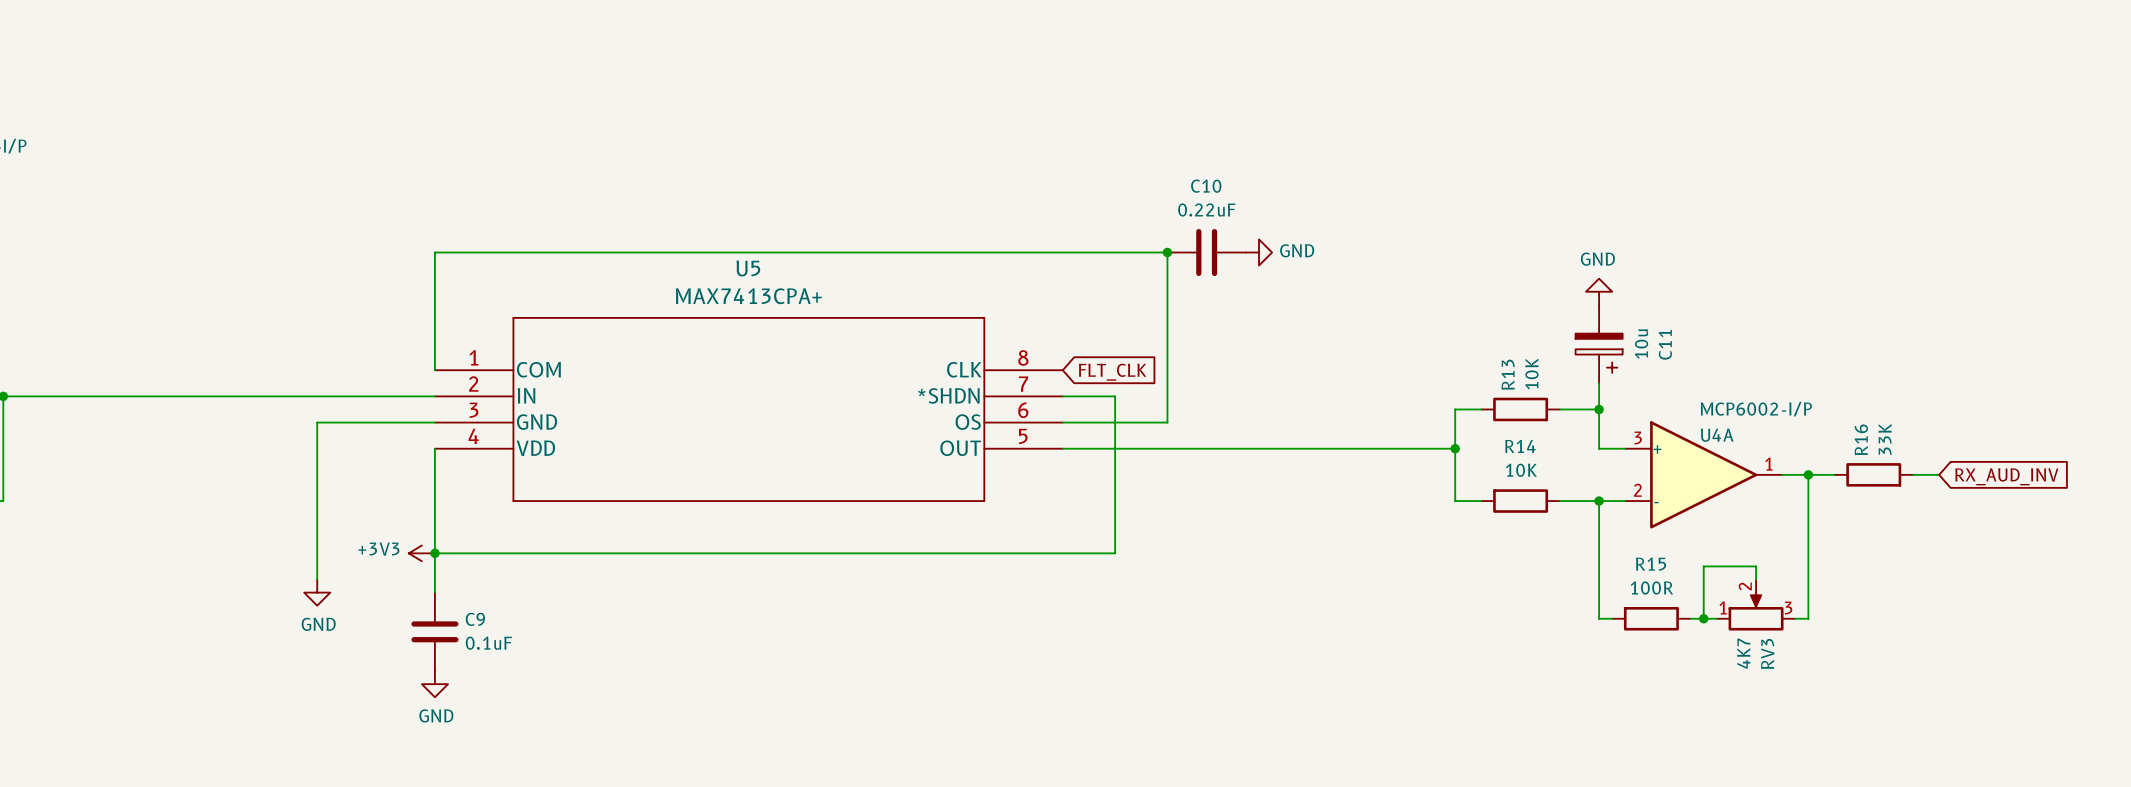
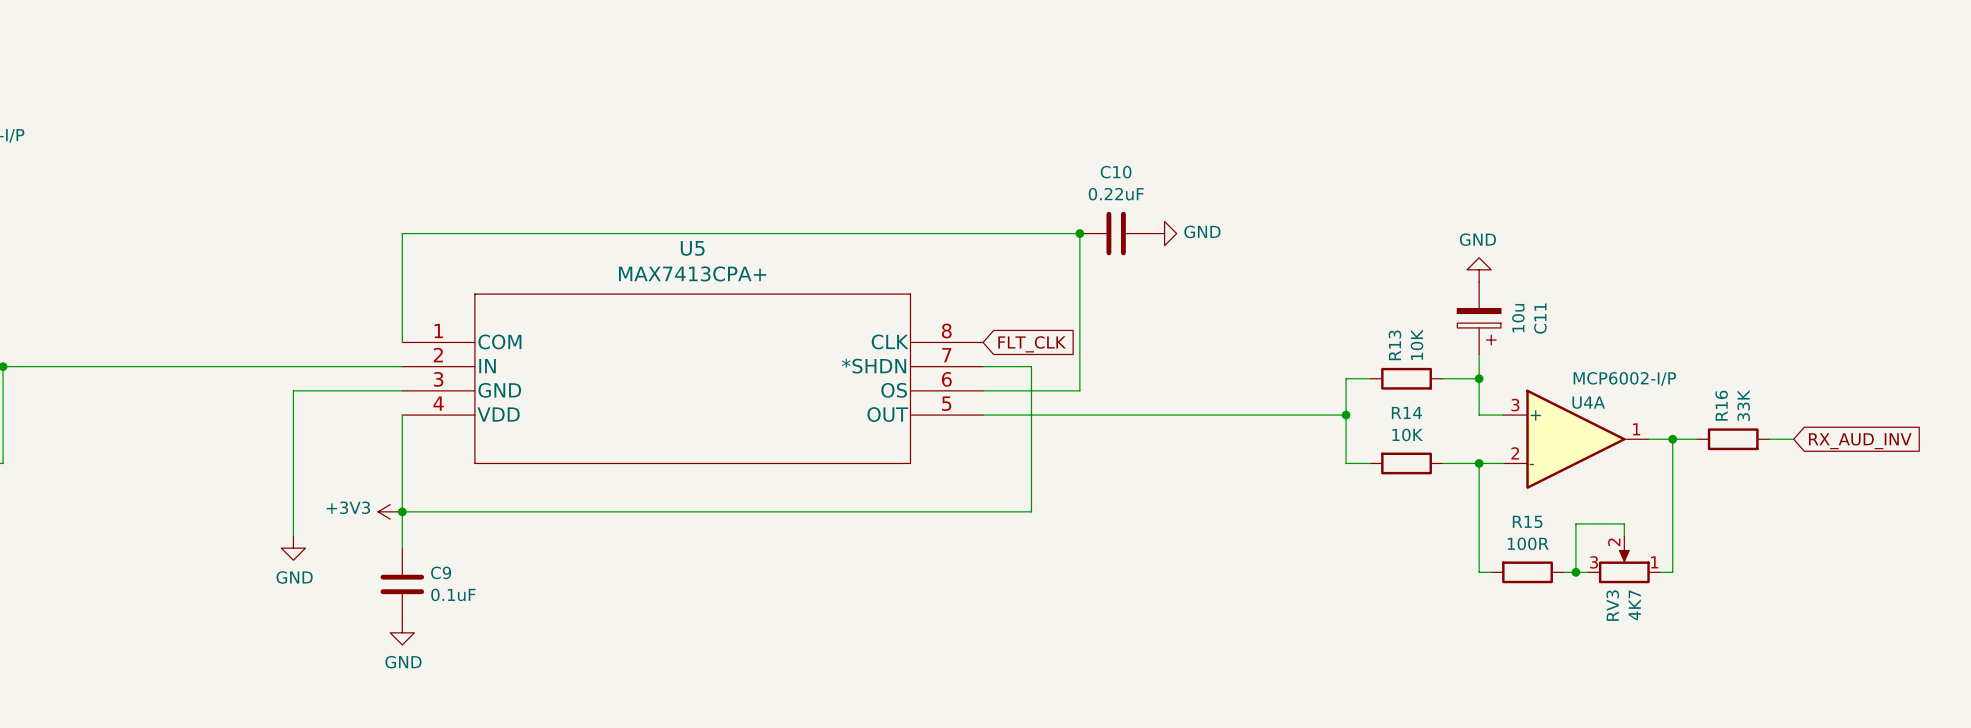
RV3 flip: as is (1756, 611) -> left-right (1624, 565)

